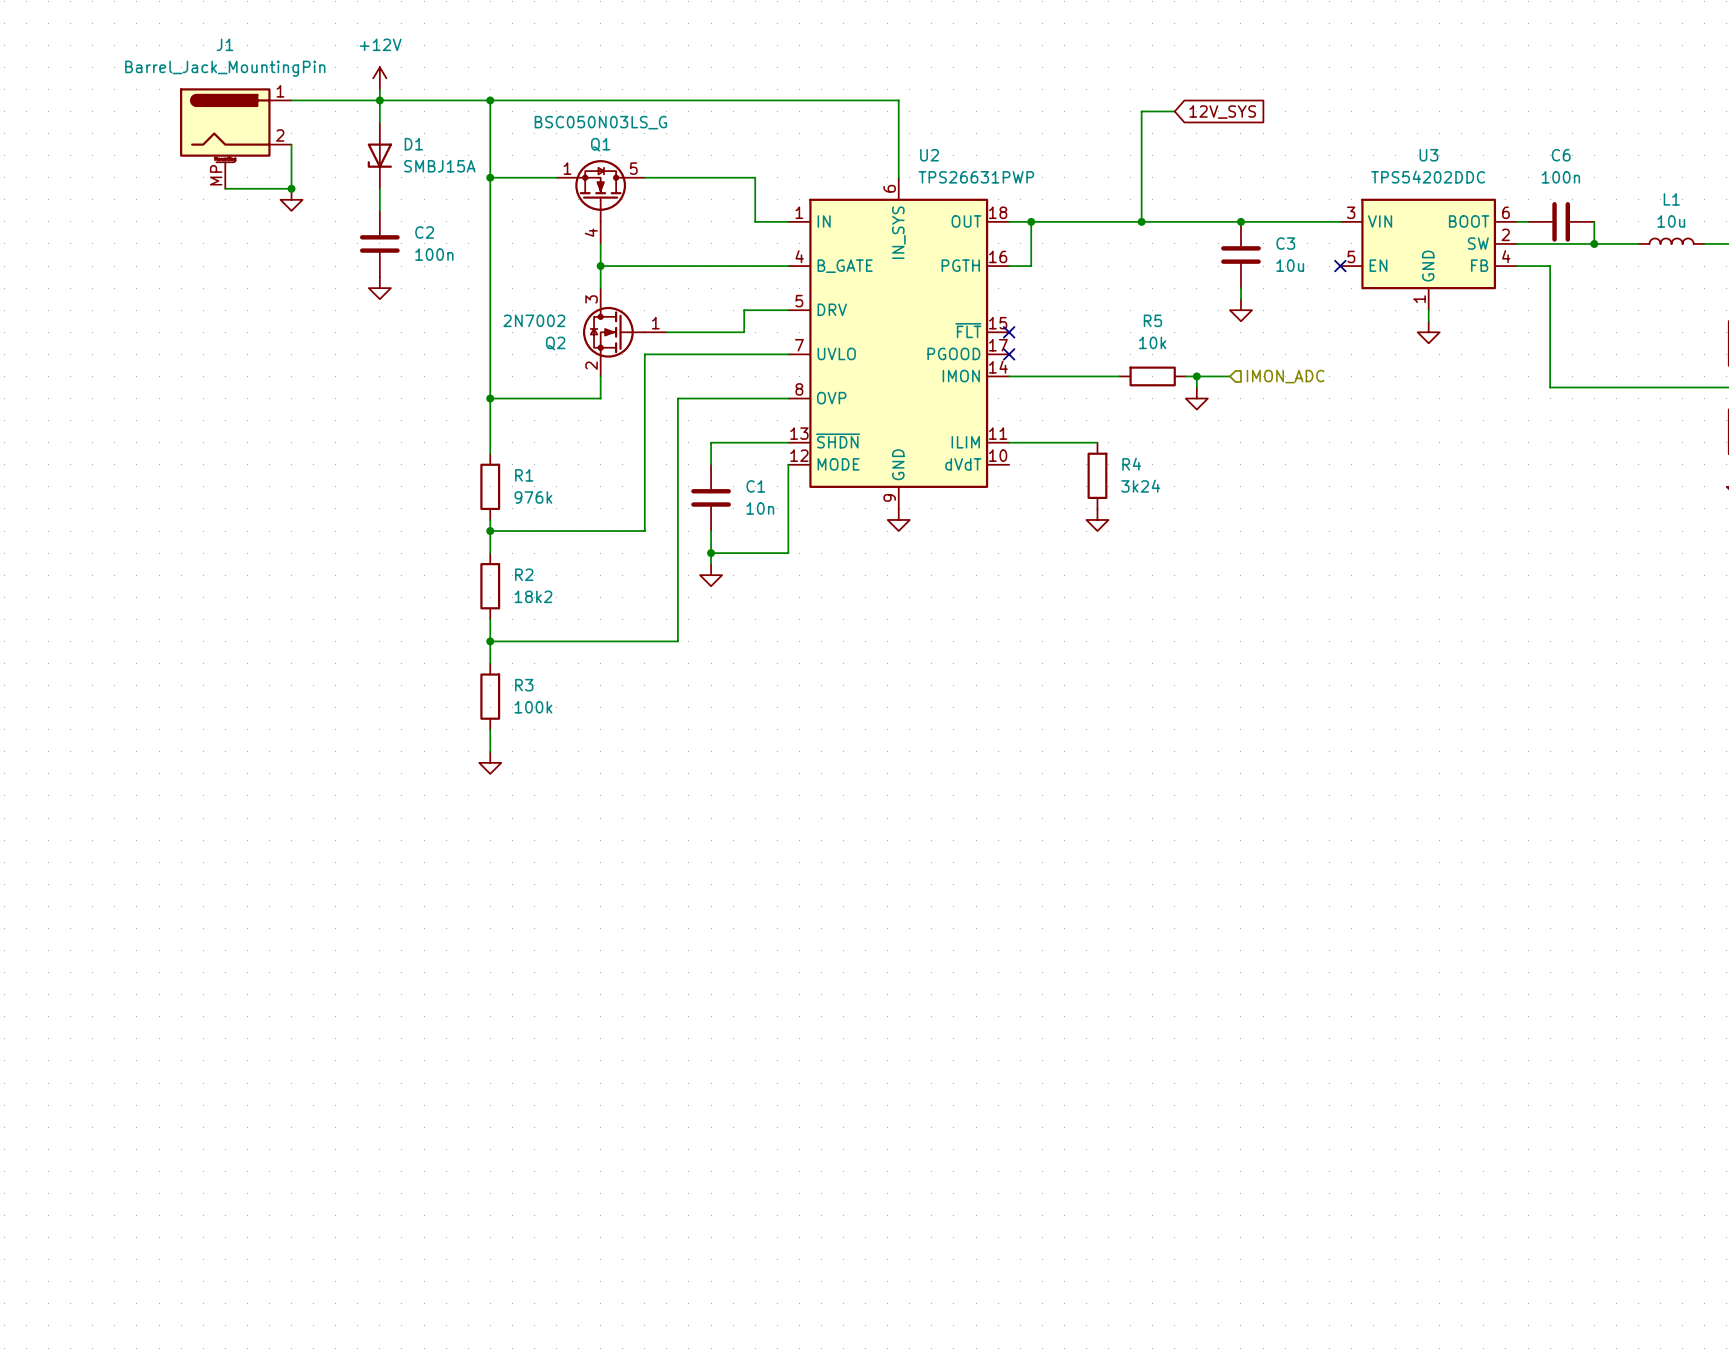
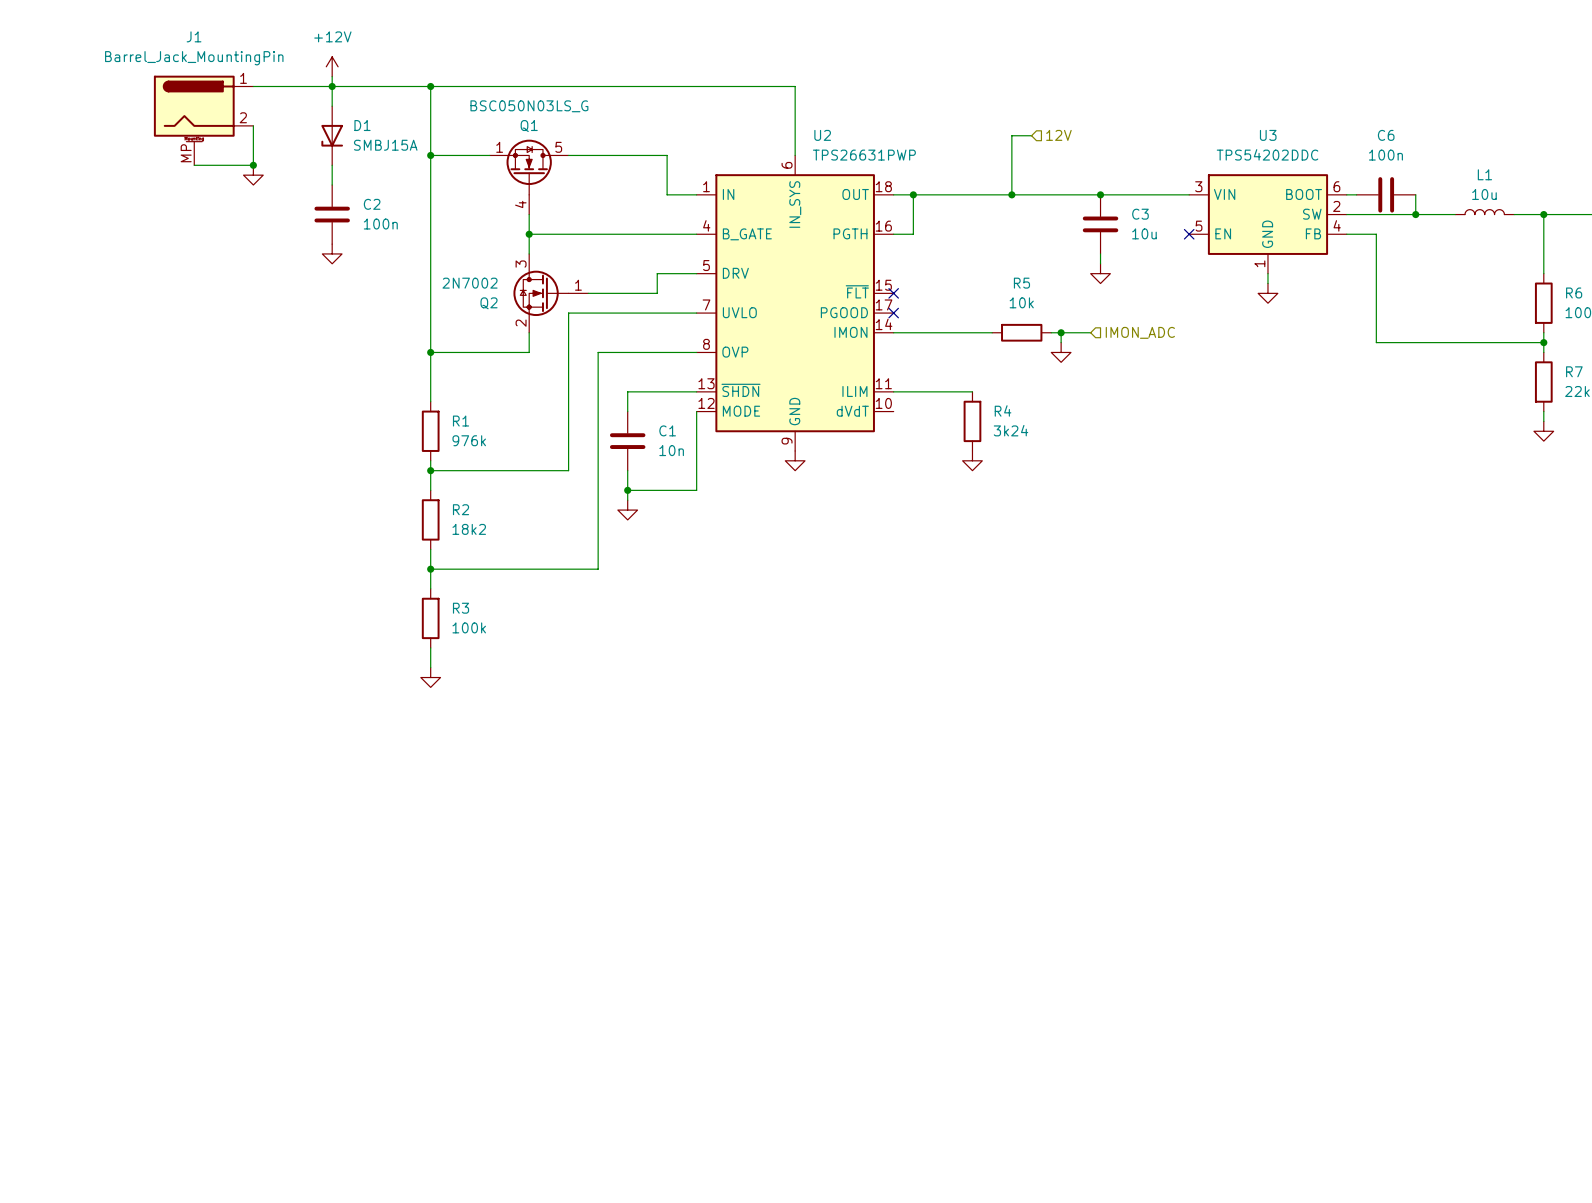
wire: (1174, 111) (1141, 111) (1141, 155) -> (1031, 135) (1011, 135)
global label: 12V_SYS (1222, 112) -> none
hierarchical label: none -> 12V (1058, 135)

